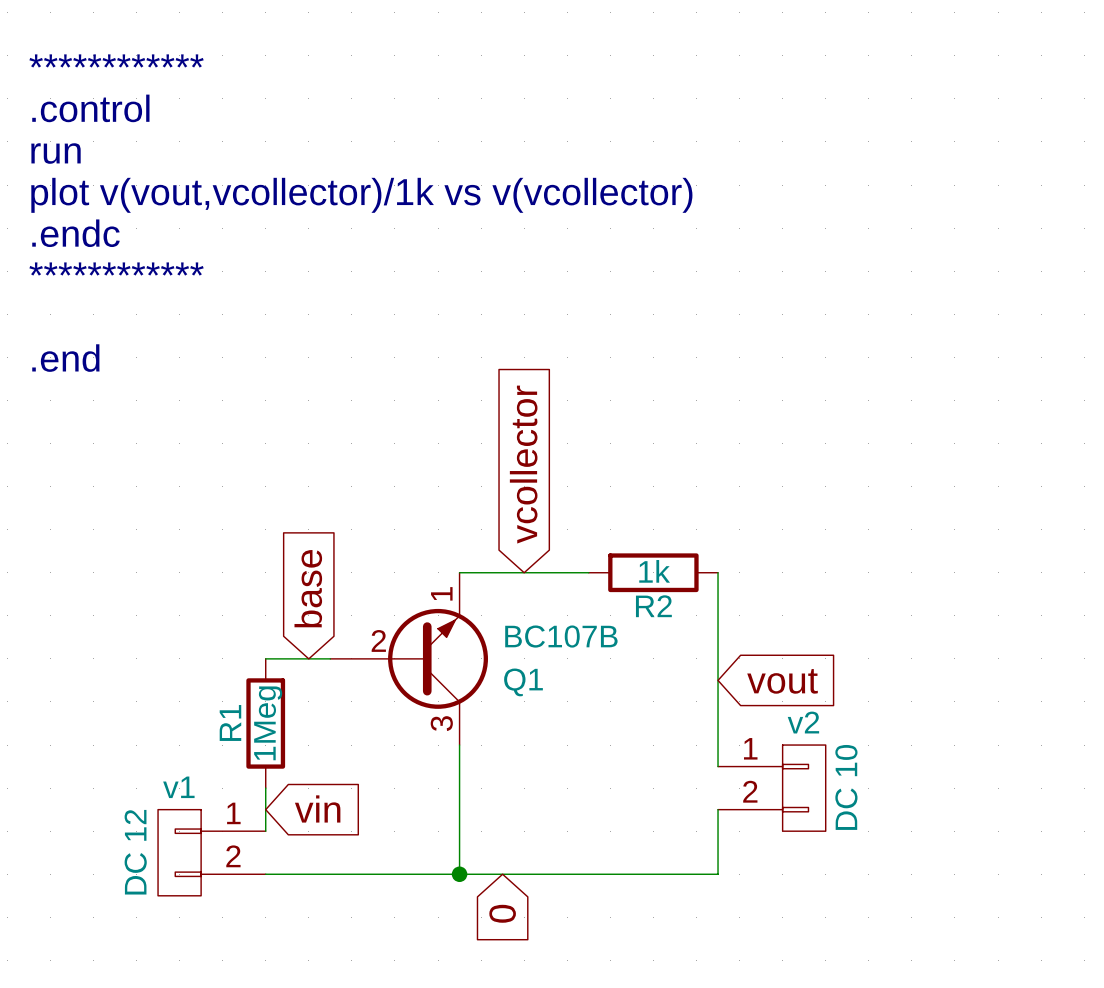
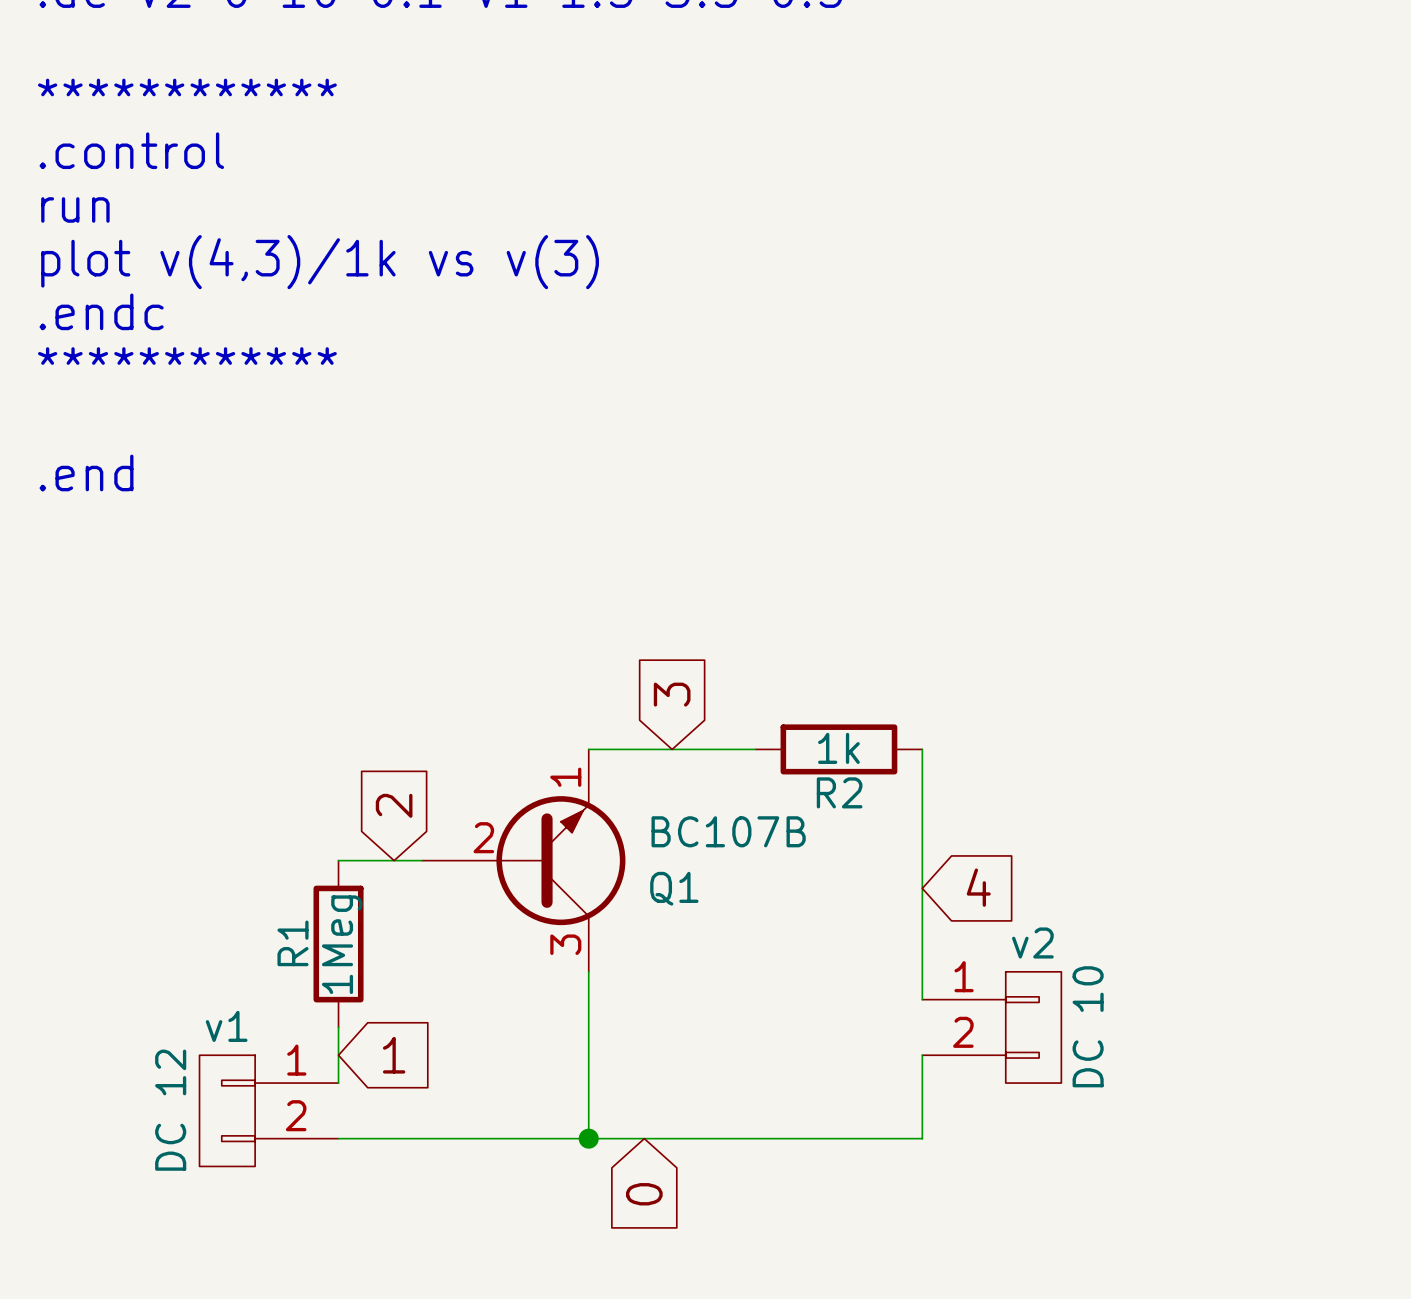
text: plot v(vout,vcollector)/1k vs v(vcollector) (361, 195) -> plot v(4,3)/1k vs v(3) (320, 262)
global label: vcollector (523, 464) -> 3 (672, 694)
global label: base (308, 588) -> 2 (394, 805)
global label: vout (782, 681) -> 4 (978, 887)
global label: vin (317, 808) -> 1 (394, 1055)

